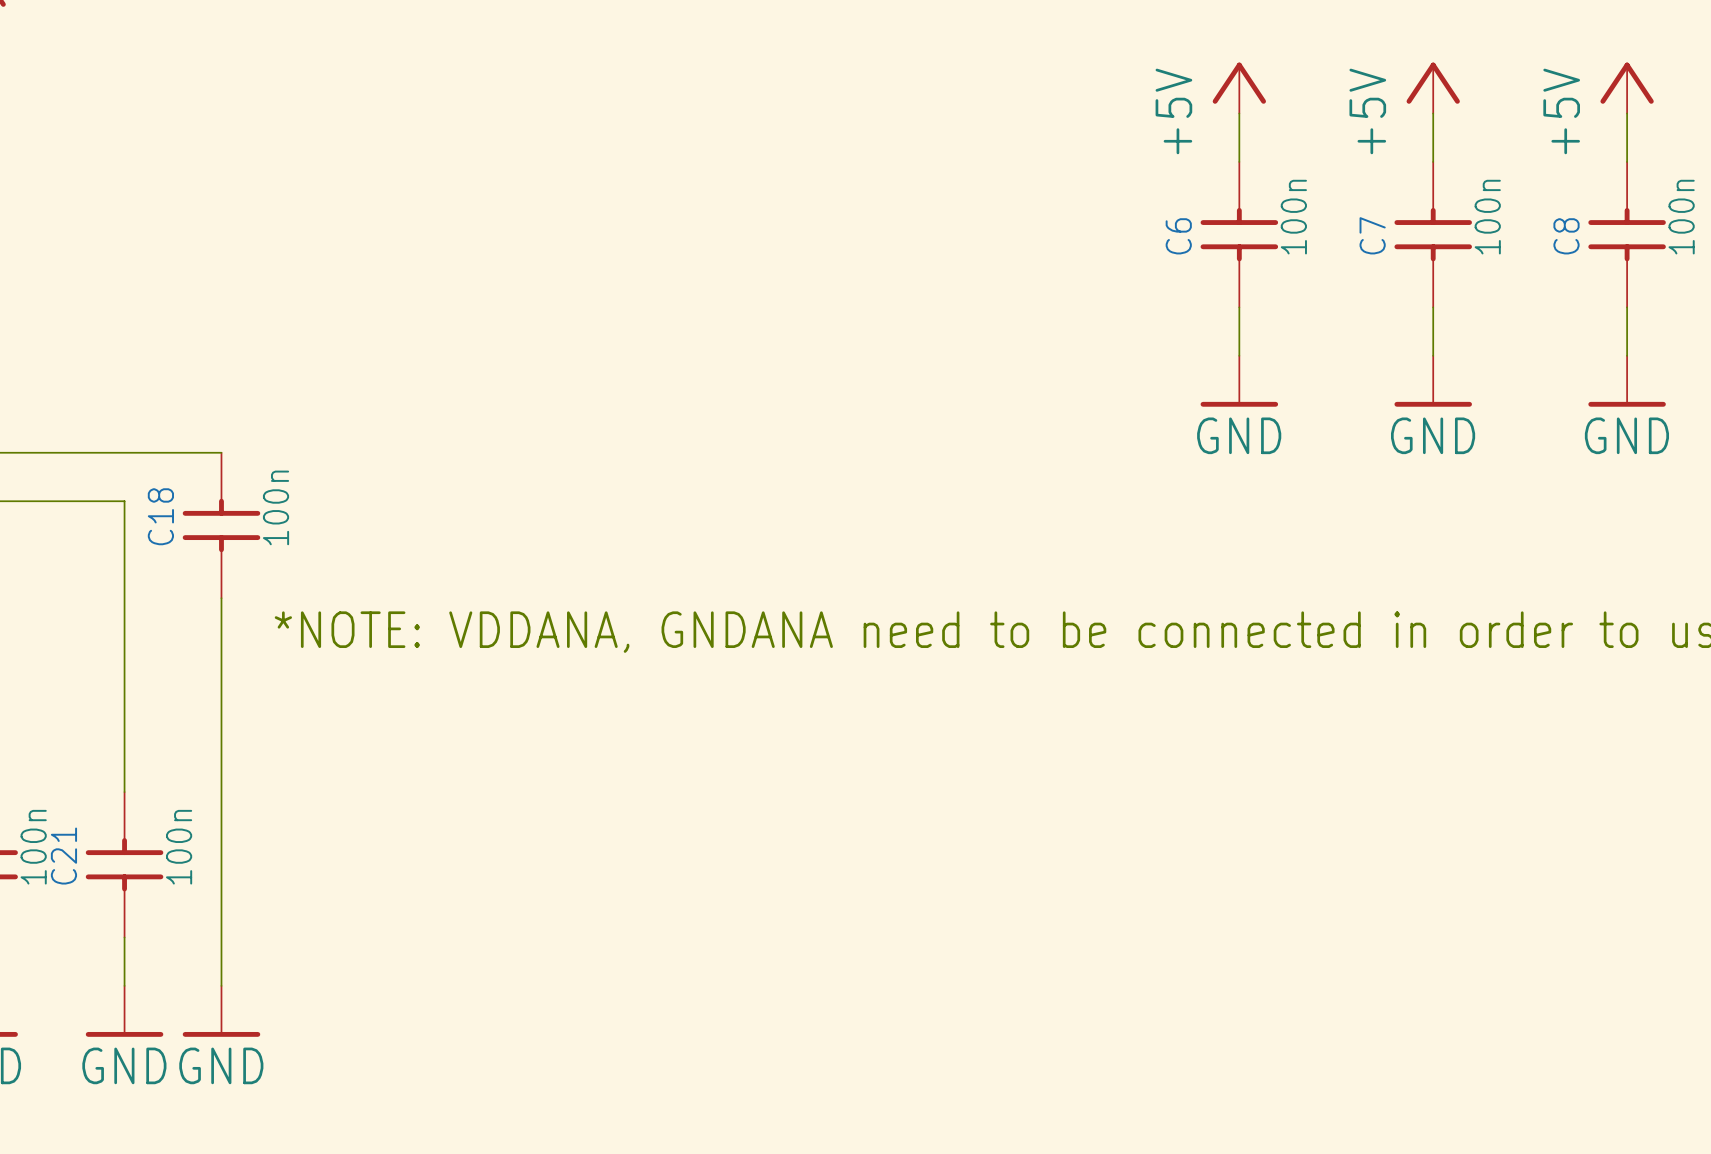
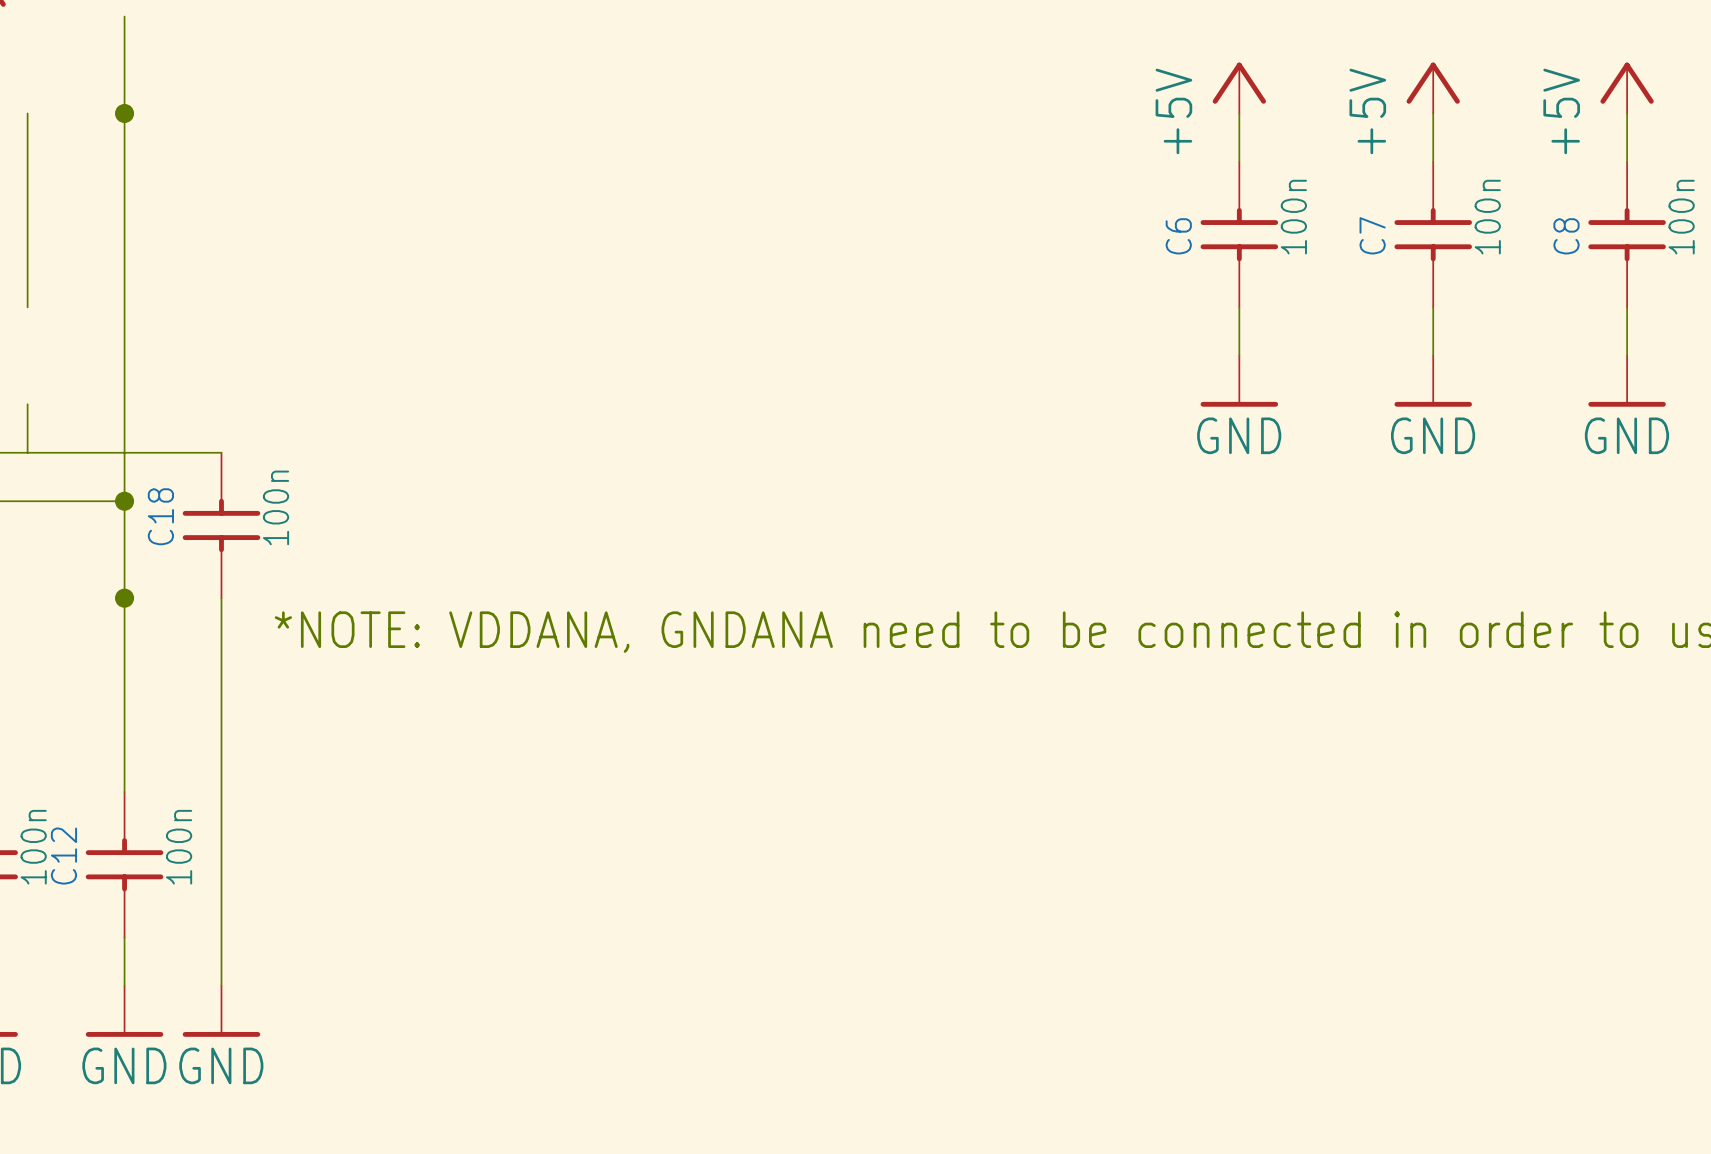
wire: none -> (124, 16) (124, 501)
wire: none -> (27, 113) (27, 307)
junction: none -> (124, 113)
wire: none -> (27, 404) (27, 452)
junction: none -> (124, 501)
junction: none -> (124, 598)
C21 name: C21 (63, 856) -> C12 (63, 856)

